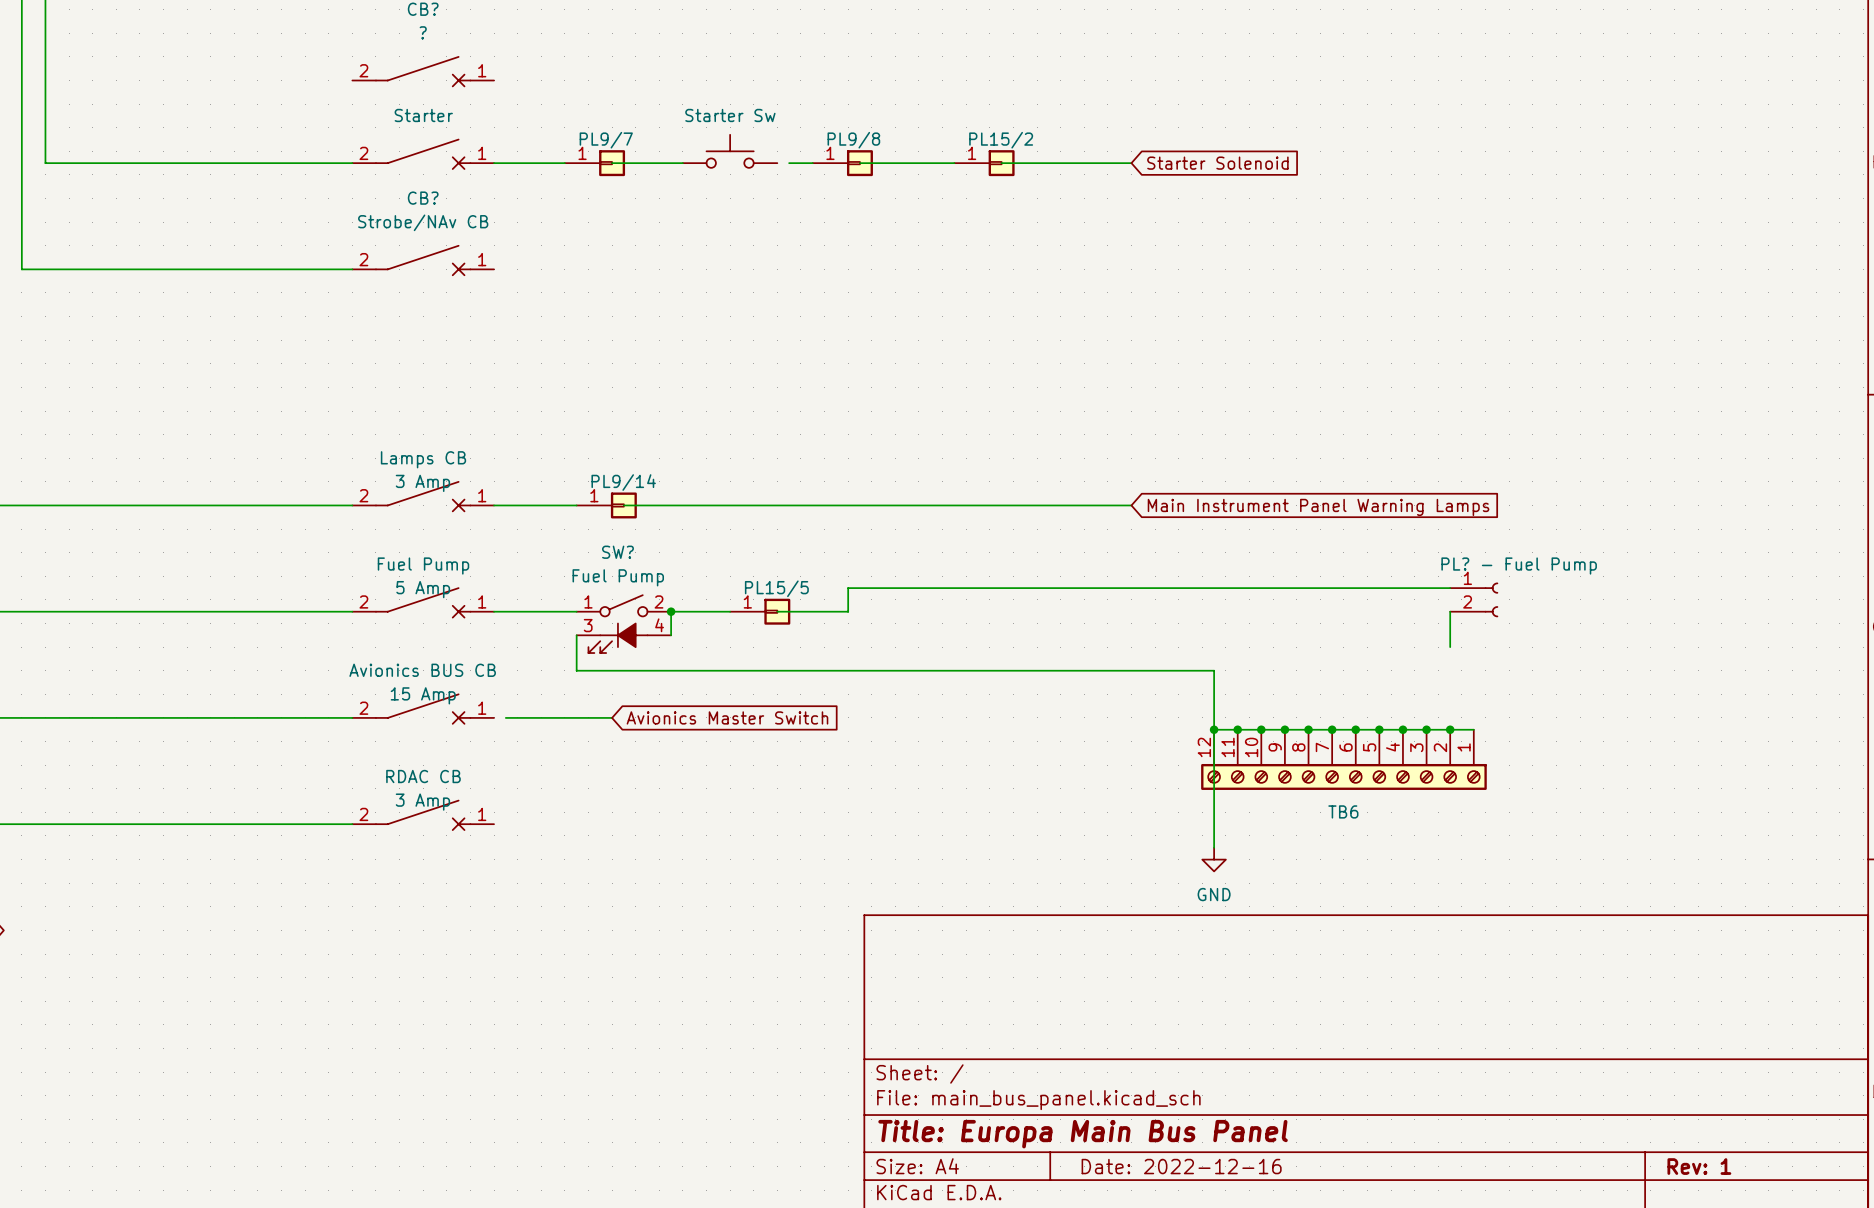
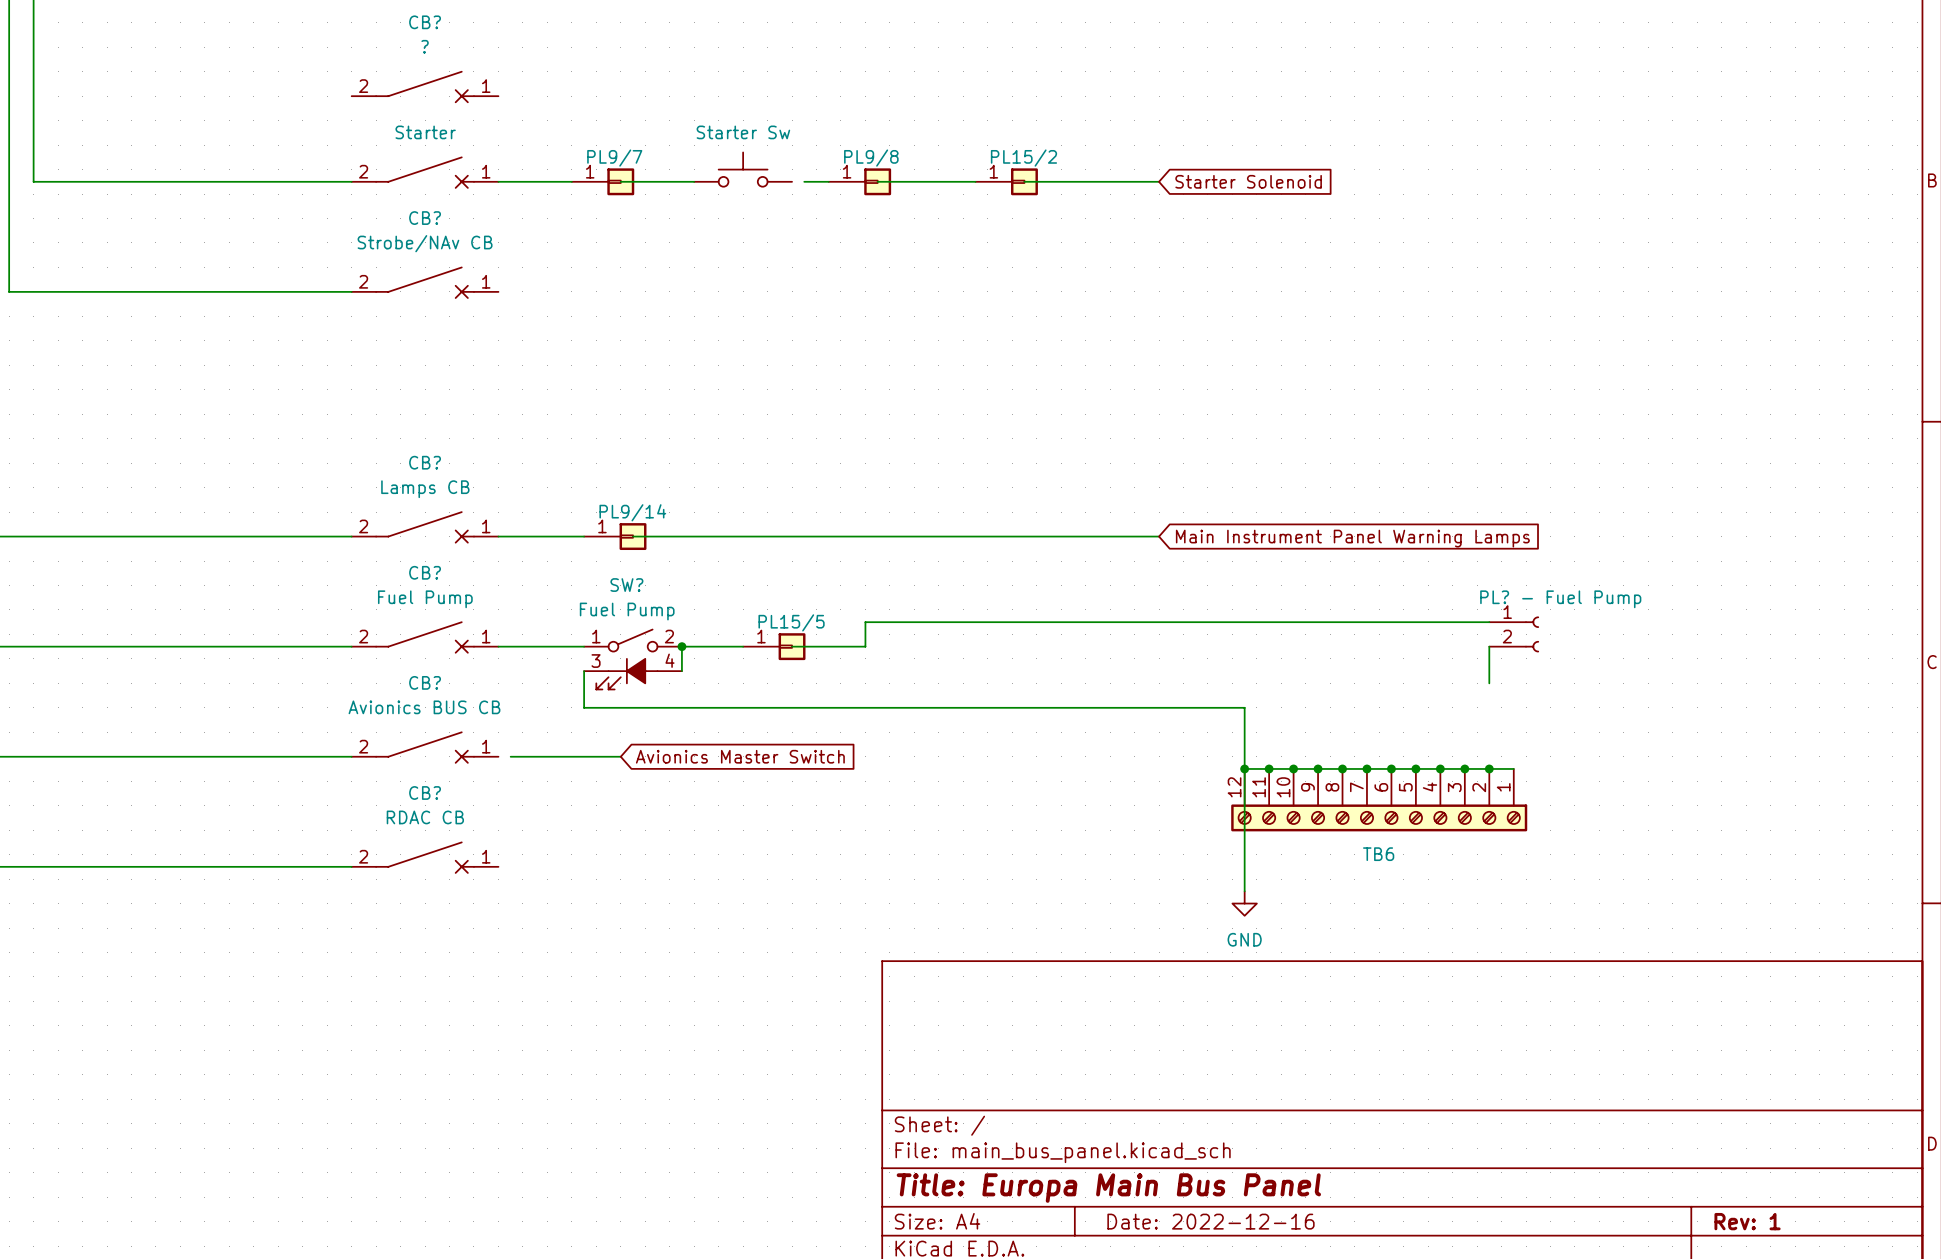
CB? name: none -> CB? (425, 462)
CB? text: 3 Amp (422, 483) -> none
CB? name: none -> CB? (425, 572)
CB? text: 5 Amp (423, 589) -> none
CB? name: none -> CB? (425, 682)
CB? text: 15 Amp (423, 695) -> none
CB? name: none -> CB? (425, 792)
CB? text: 3 Amp (422, 802) -> none

